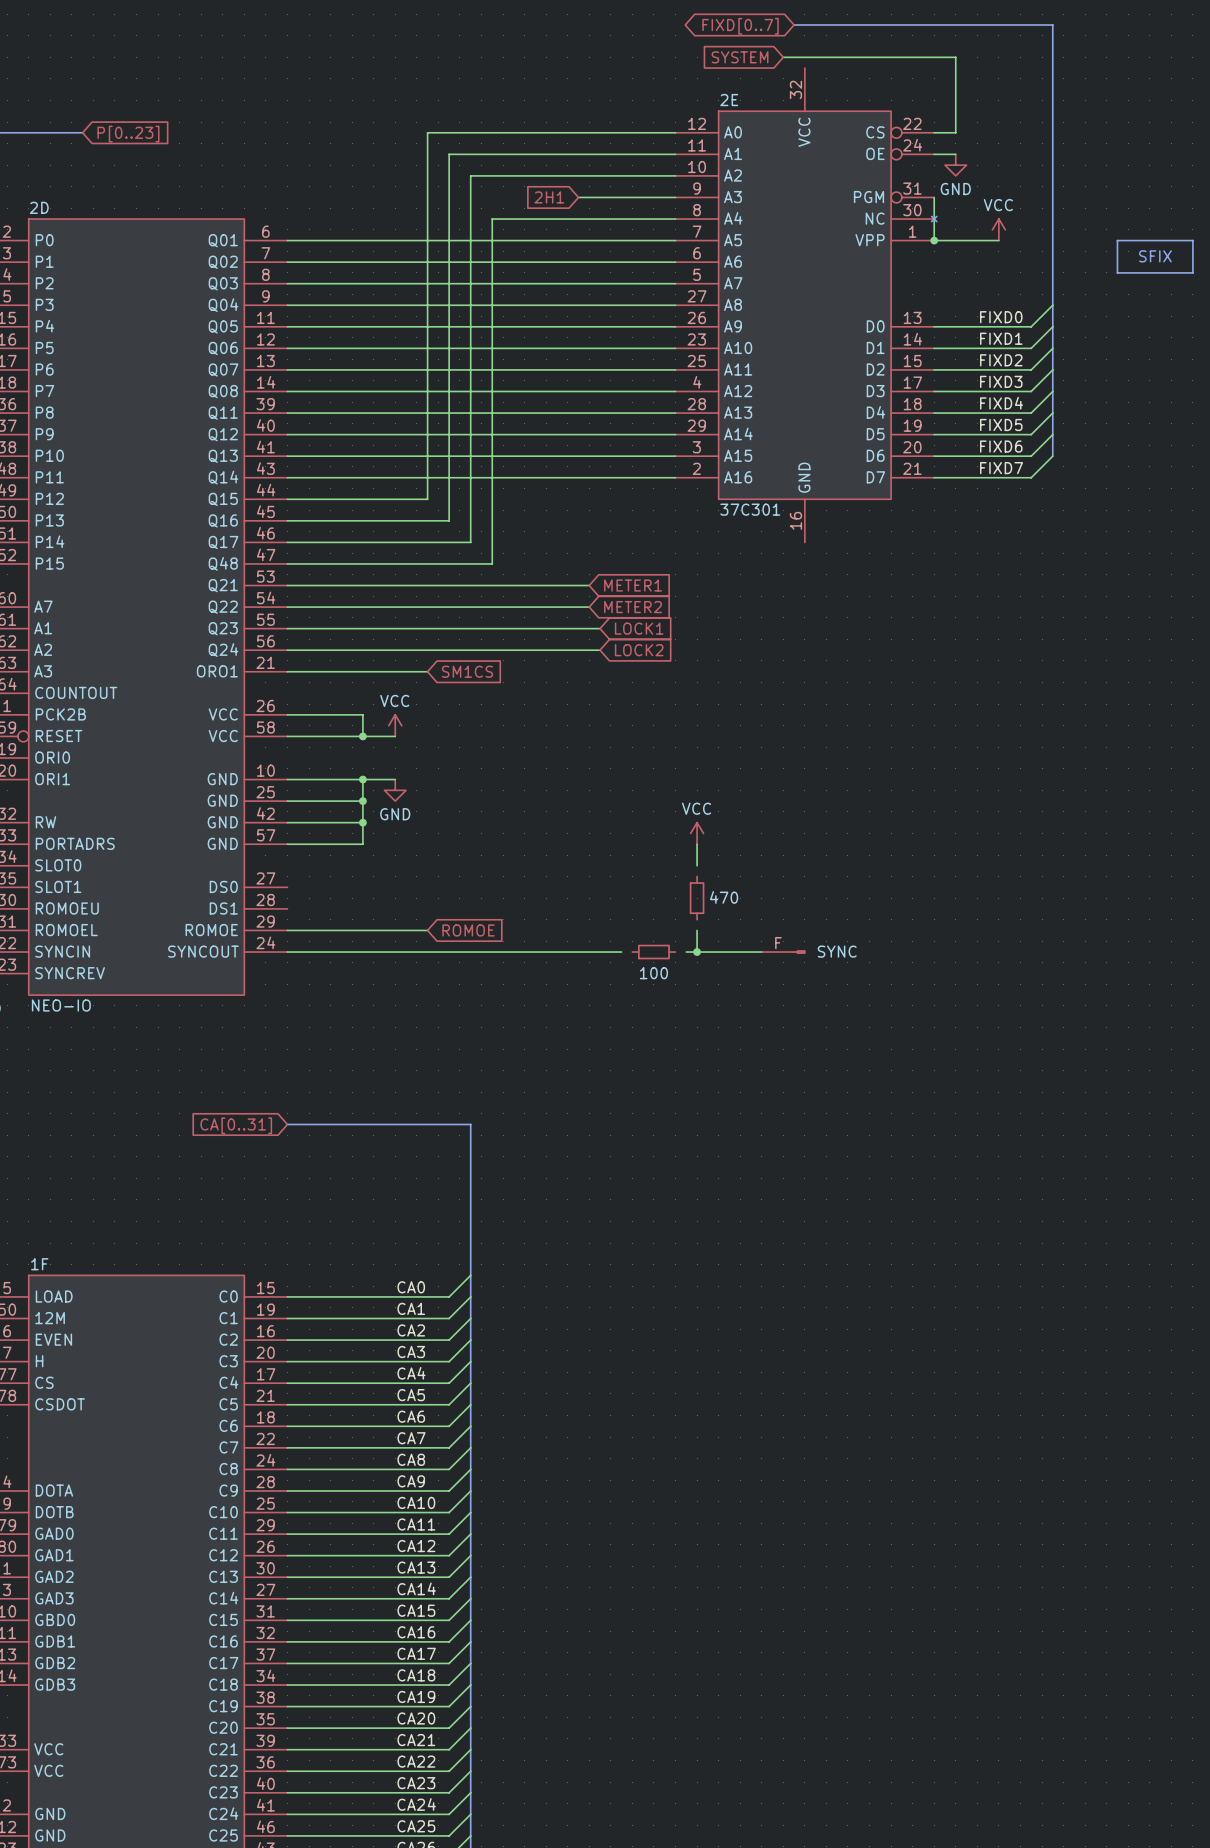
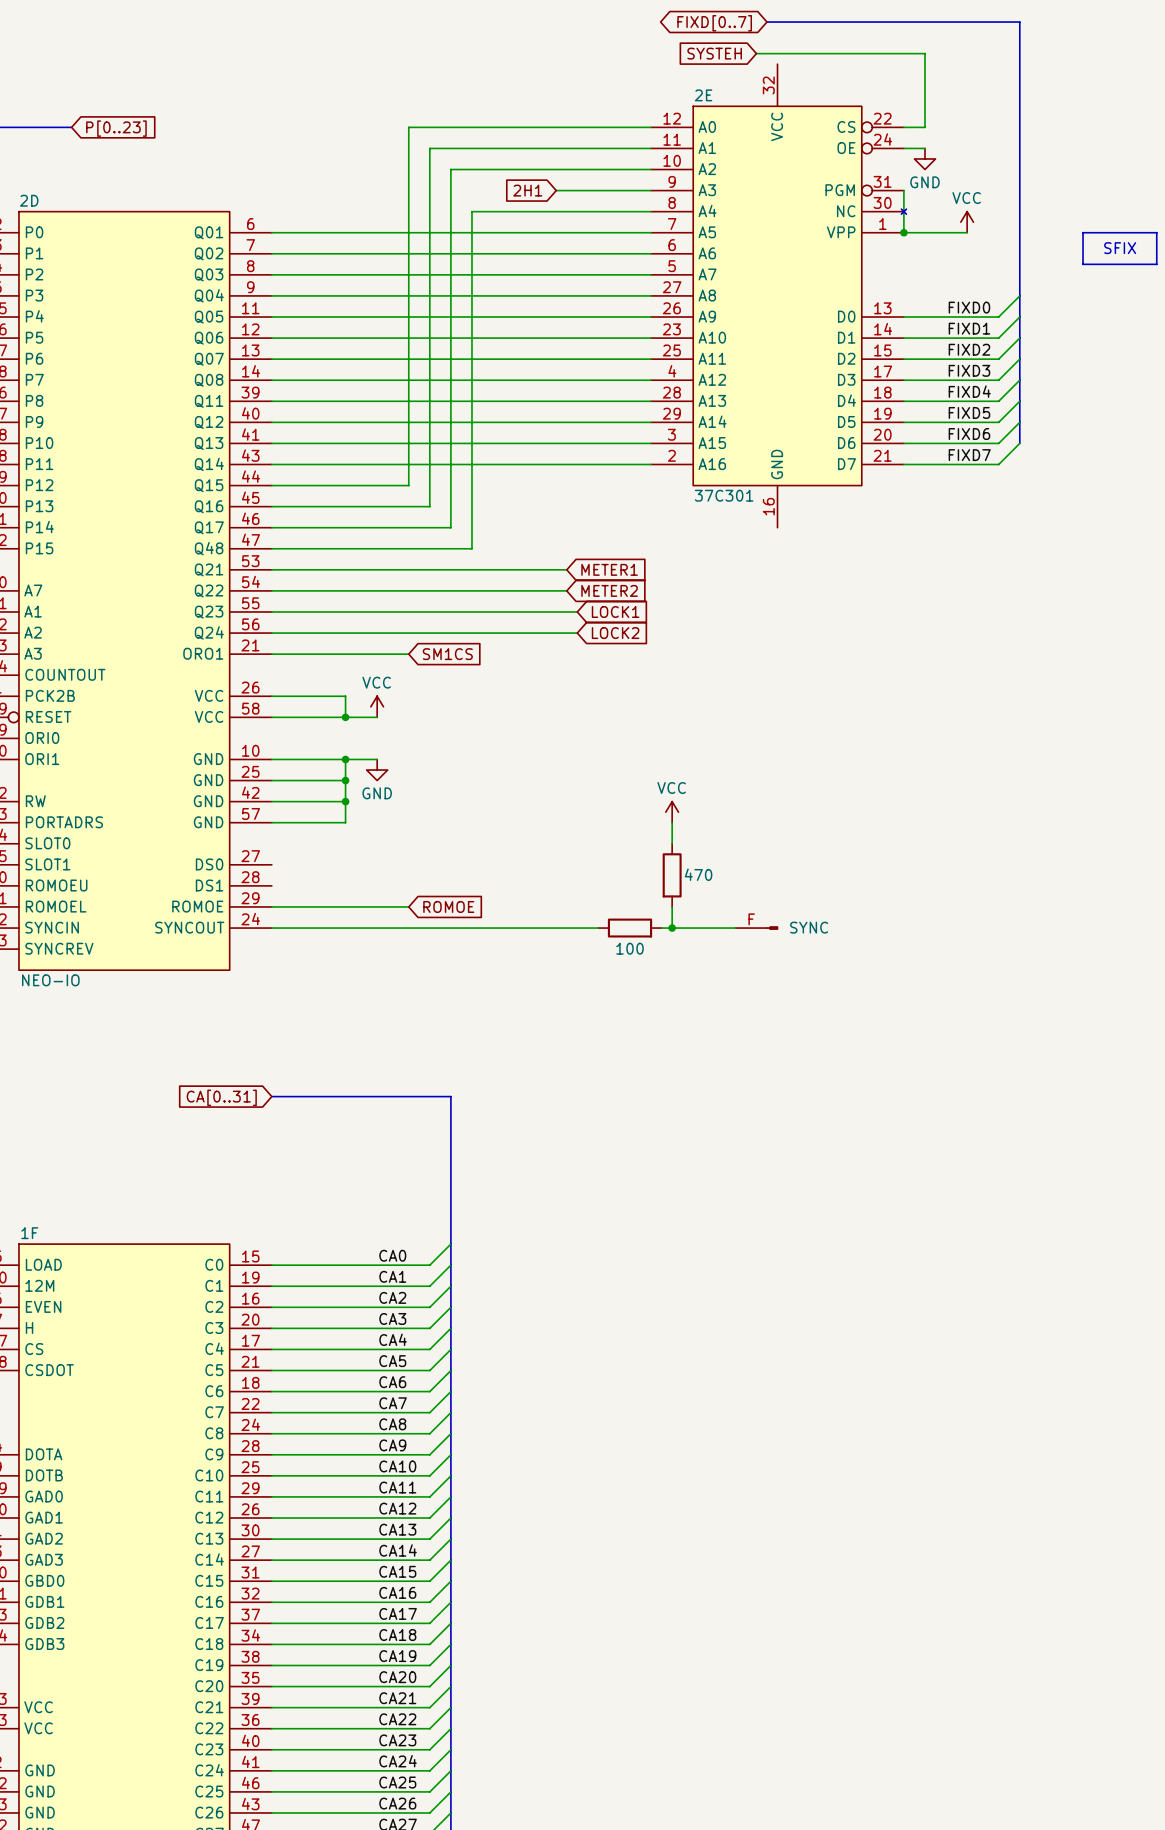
global label: SYSTEM (740, 57) -> SYSTEH (714, 53)
part symbol: [689, 876, 705, 920] -> [662, 843, 682, 907]
part symbol: [632, 944, 676, 960] -> [598, 918, 662, 938]

